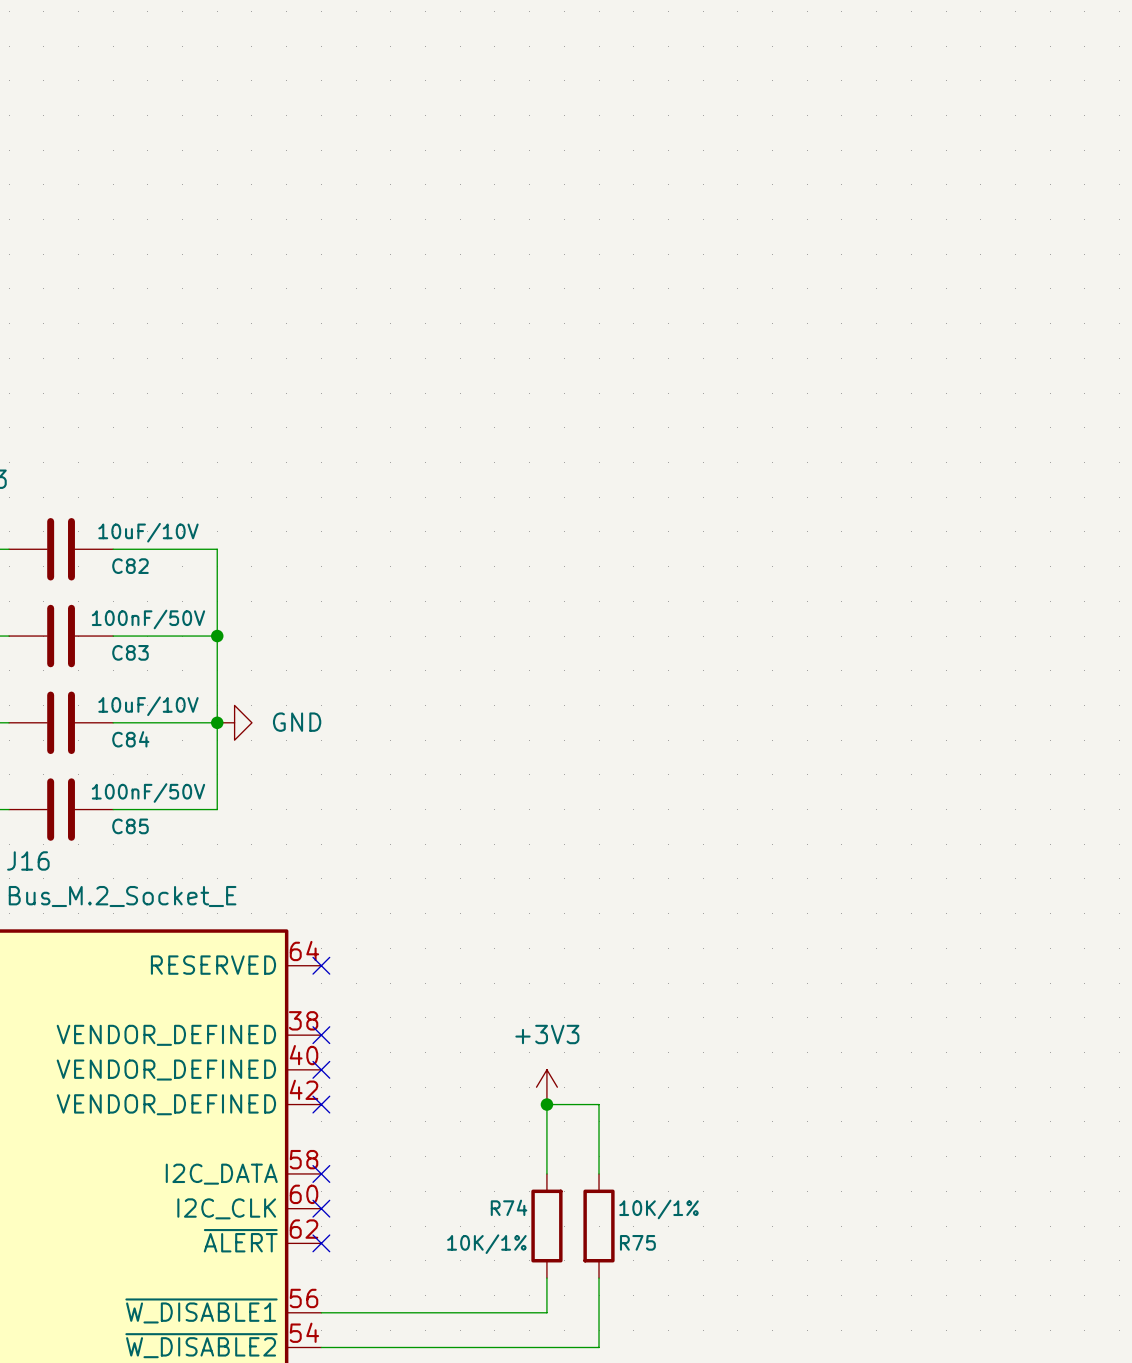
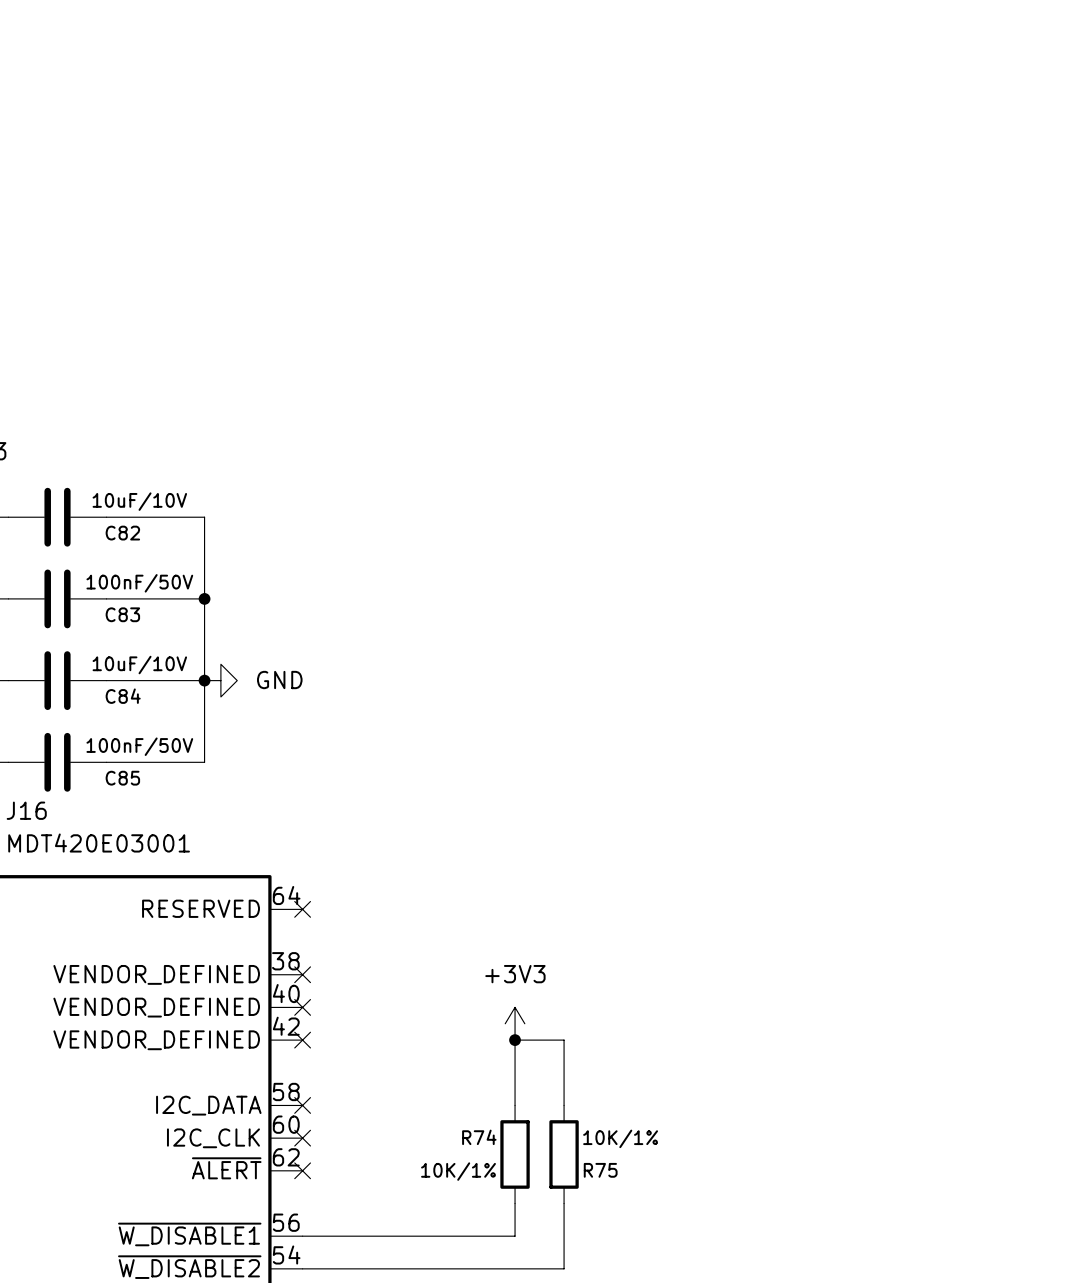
J16 value: Bus_M.2_Socket_E (122, 896) -> MDT420E03001 (99, 843)

